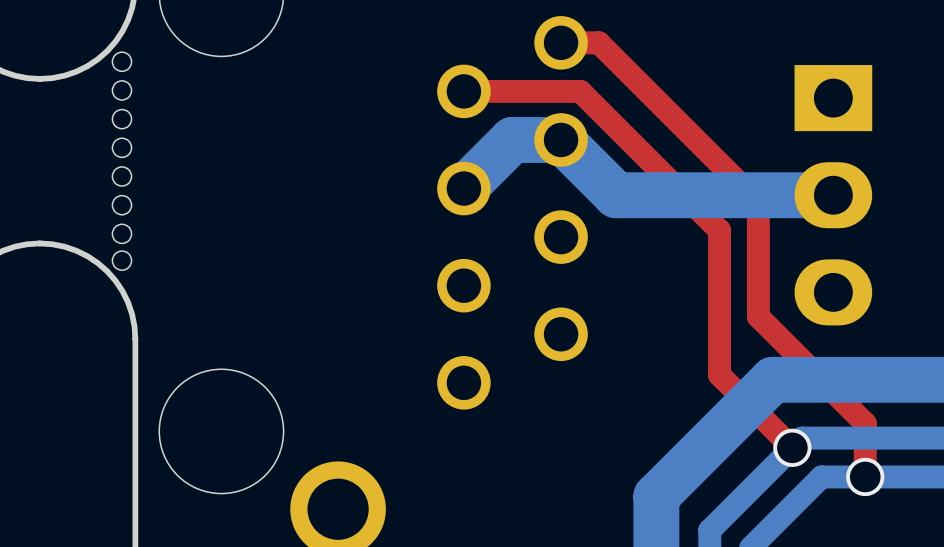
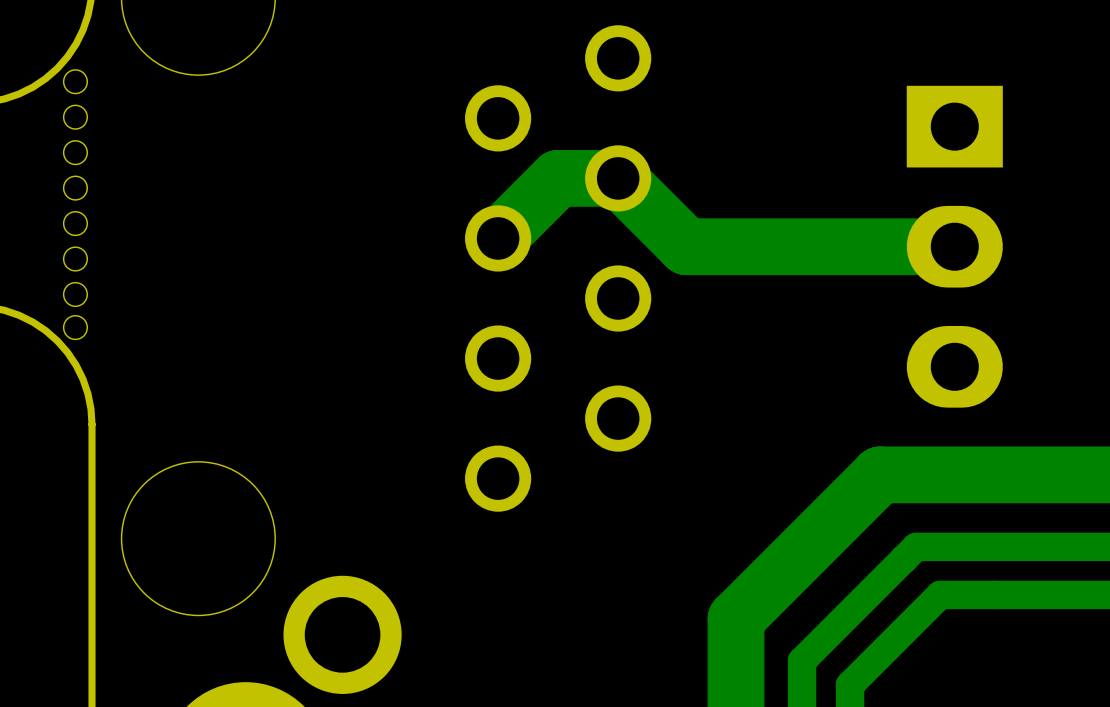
top track: (561, 42) (598, 42) (758, 202) (758, 316) (865, 423) (865, 476) -> none
top track: (463, 91) (580, 91) (719, 230) (719, 374) (792, 447) -> none
via: (792, 447) -> none
via: (865, 476) -> none

